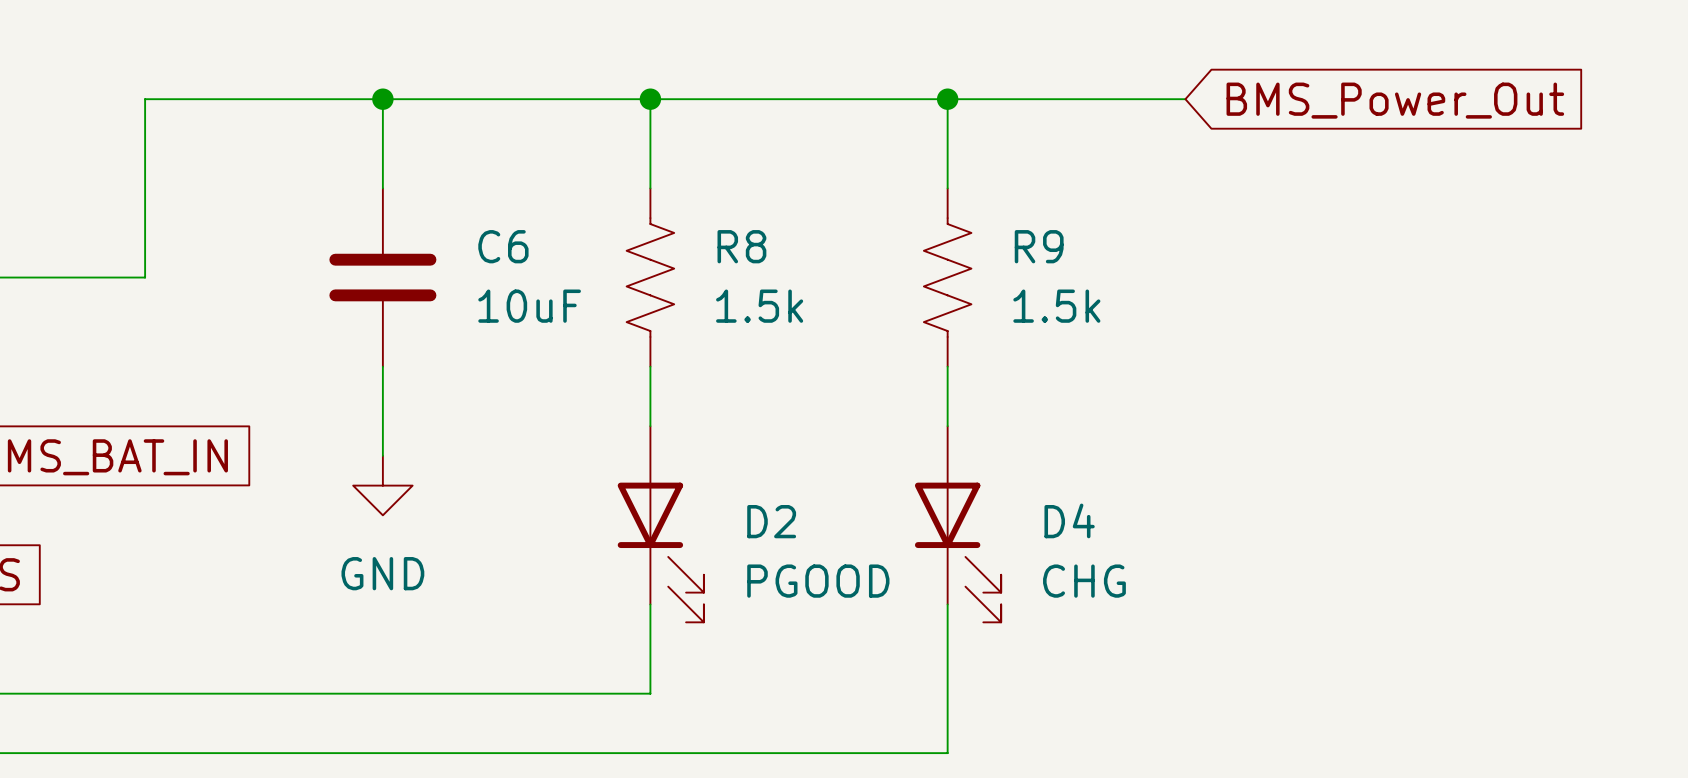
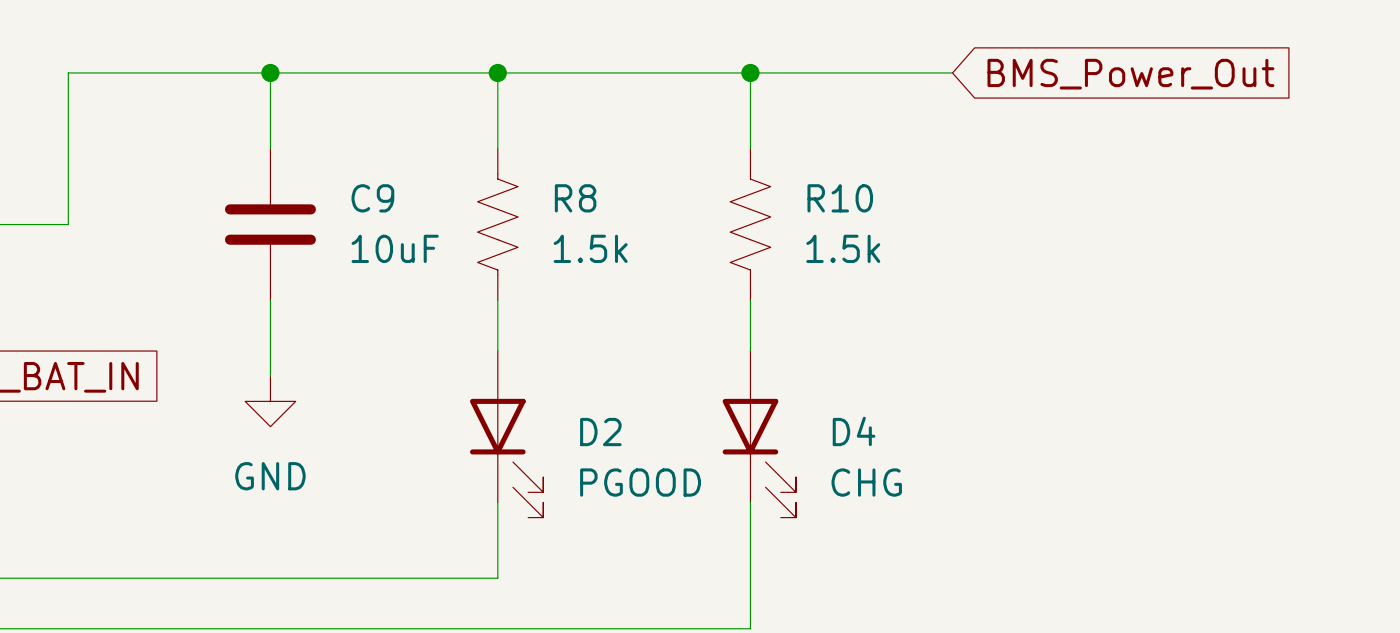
C6 name: C6 (503, 246) -> C9 (372, 198)
R9 name: R9 (1039, 246) -> R10 (840, 198)

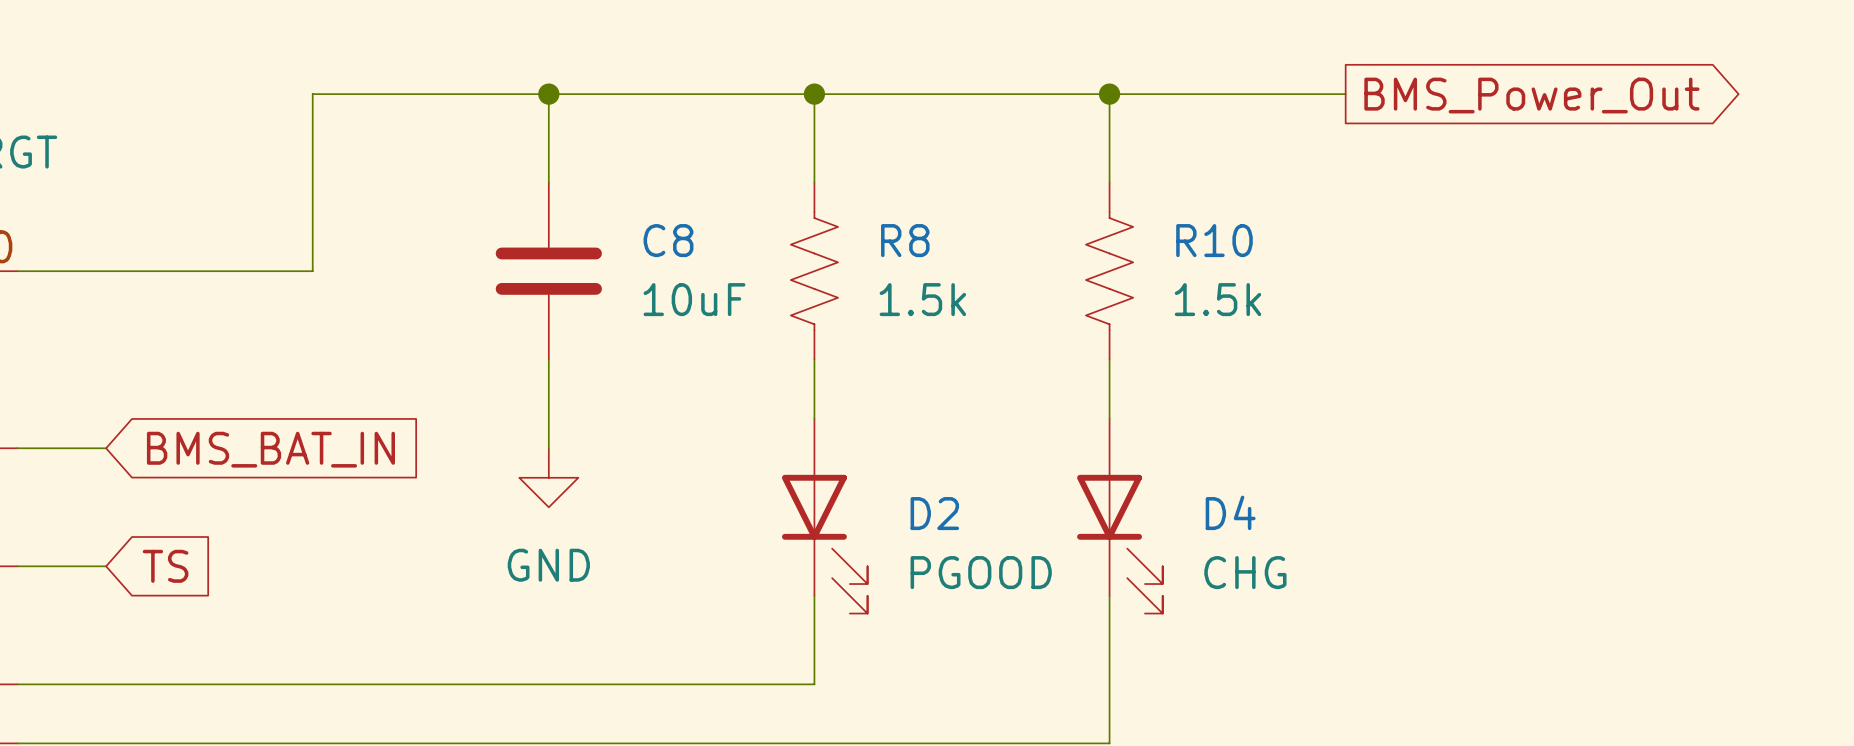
global label shape: input (1130, 74) -> output (1531, 95)
C9 name: C9 (372, 198) -> C8 (668, 240)

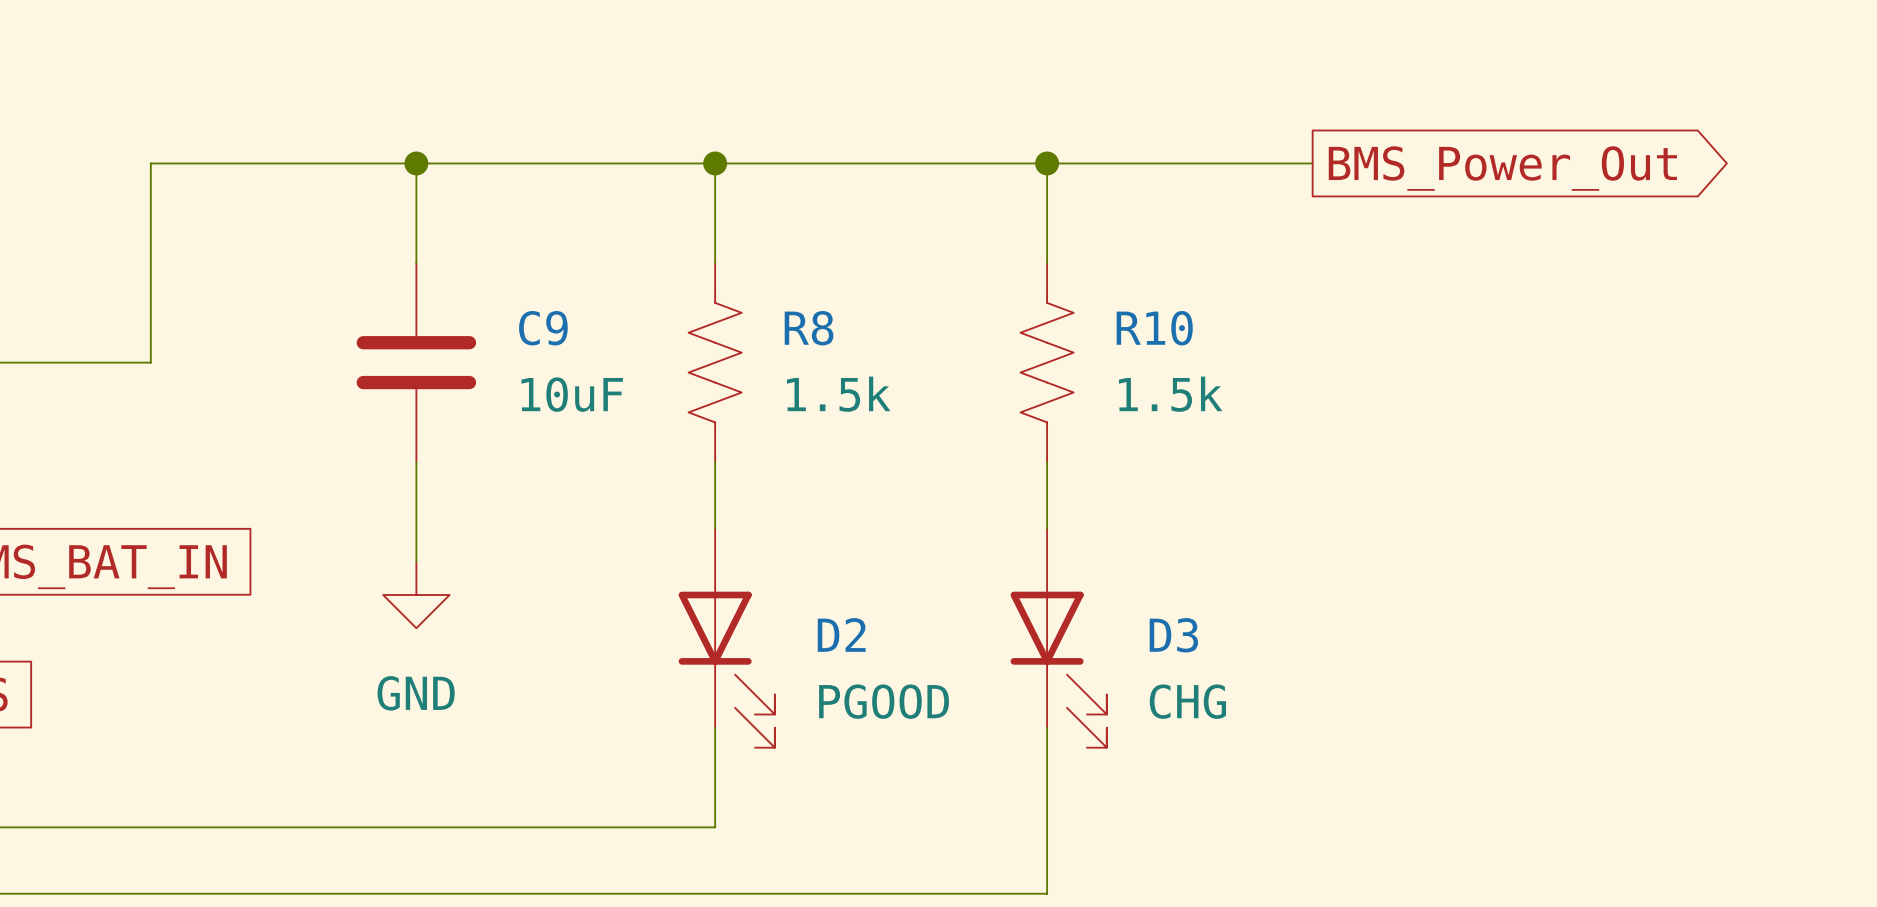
C8 name: C8 (668, 240) -> C9 (543, 328)
D4 name: D4 (1230, 512) -> D3 (1173, 635)

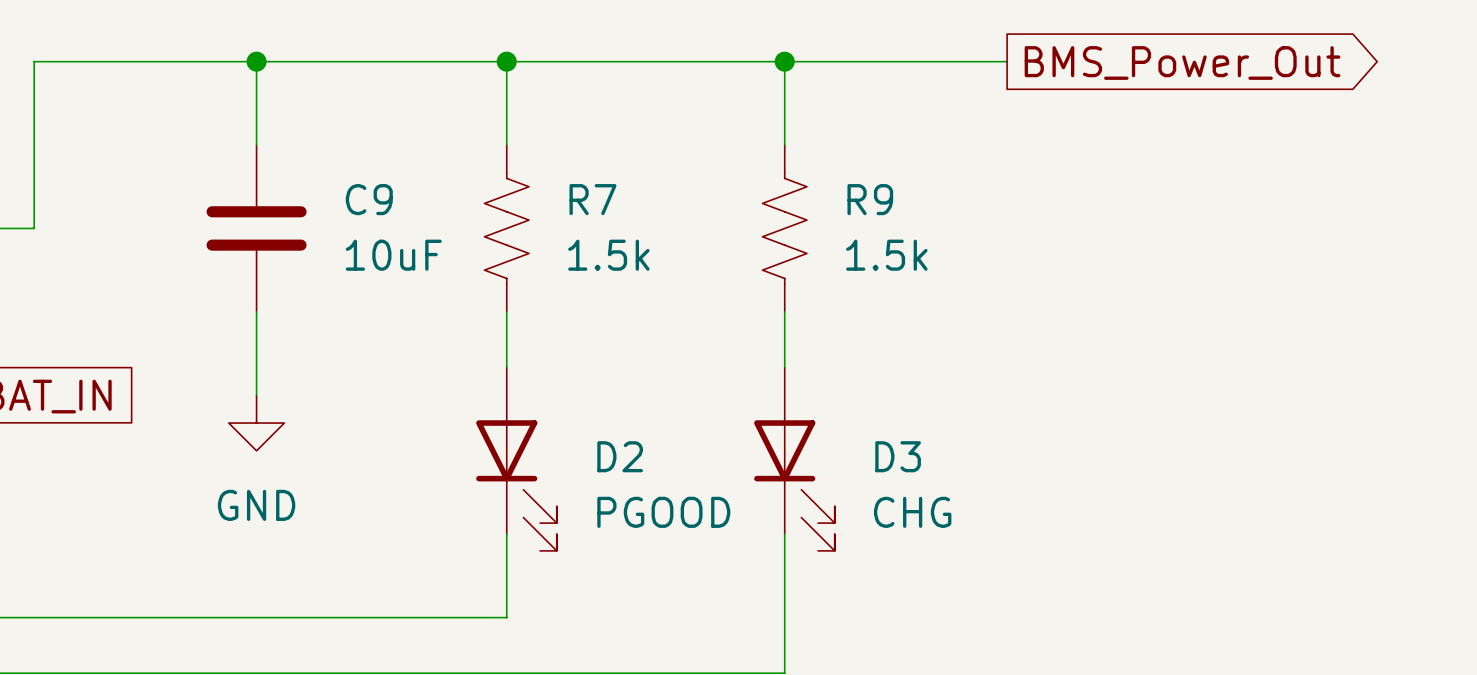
R8 name: R8 (809, 328) -> R7 (592, 199)
R10 name: R10 (1154, 328) -> R9 (870, 199)

